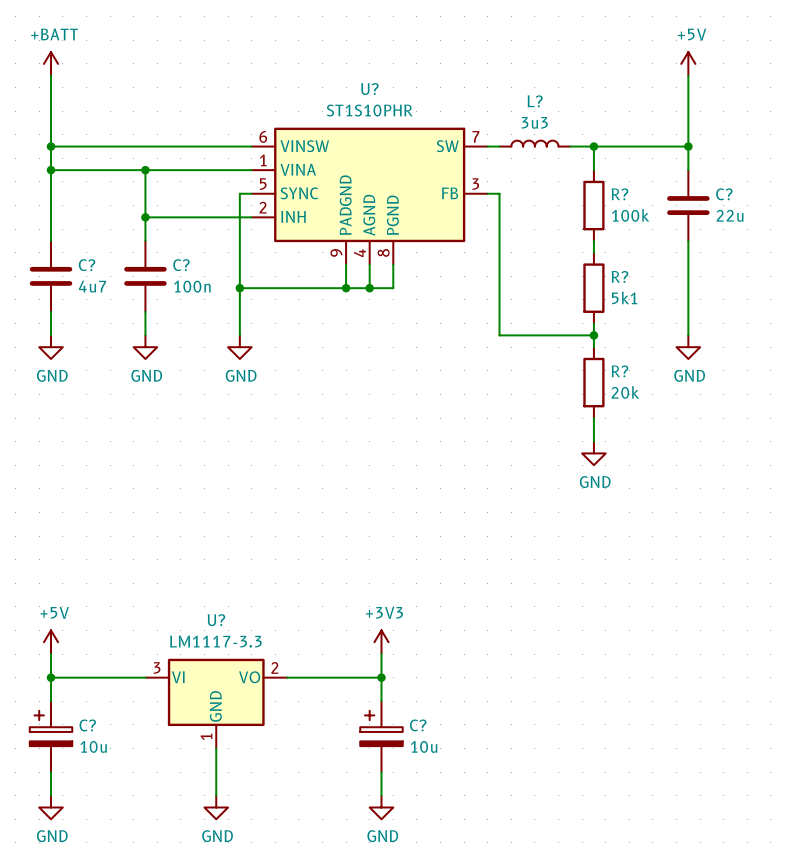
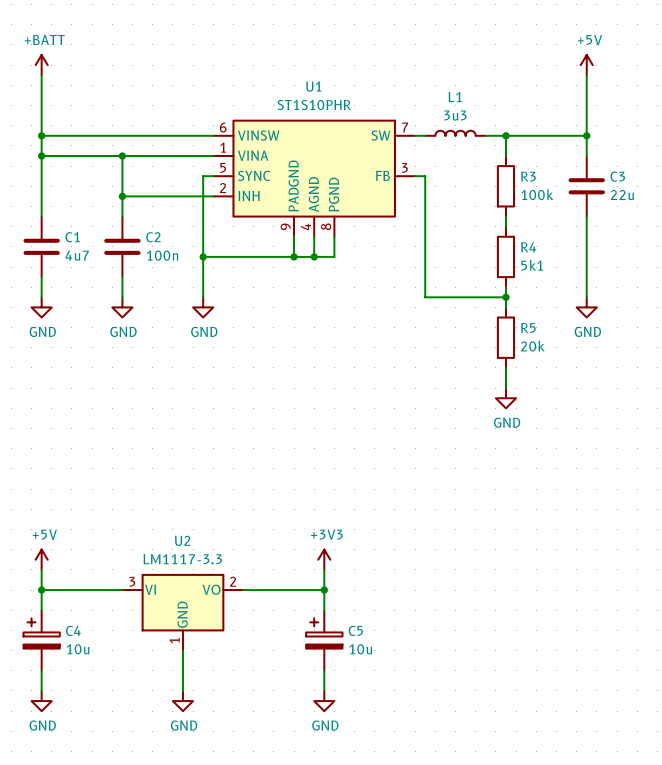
U? name: U? (369, 89) -> U1 (313, 86)
L? name: L? (535, 101) -> L1 (455, 97)
R? name: R? (619, 194) -> R3 (528, 176)
C? name: C? (724, 194) -> C3 (617, 176)
C? name: C? (87, 265) -> C1 (72, 237)
C? name: C? (181, 265) -> C2 (153, 237)
R? name: R? (619, 276) -> R4 (528, 247)
R? name: R? (619, 371) -> R5 (528, 328)
U? name: U? (216, 620) -> U2 (182, 540)
C? name: C? (87, 725) -> C4 (73, 630)
C? name: C? (418, 725) -> C5 (355, 630)

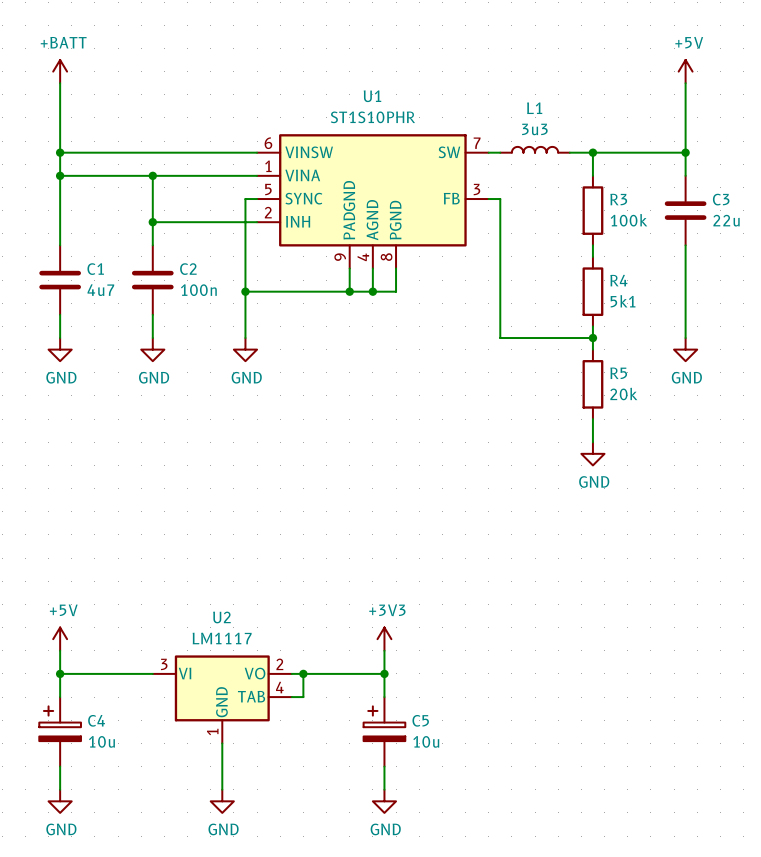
U2 value: LM1117-3.3 (182, 559) -> LM1117 (222, 638)
U2 symbol: [122, 573, 244, 651] -> [152, 655, 292, 744]
wire: none -> (303, 673) (303, 697) (291, 697)
junction: none -> (303, 673)

